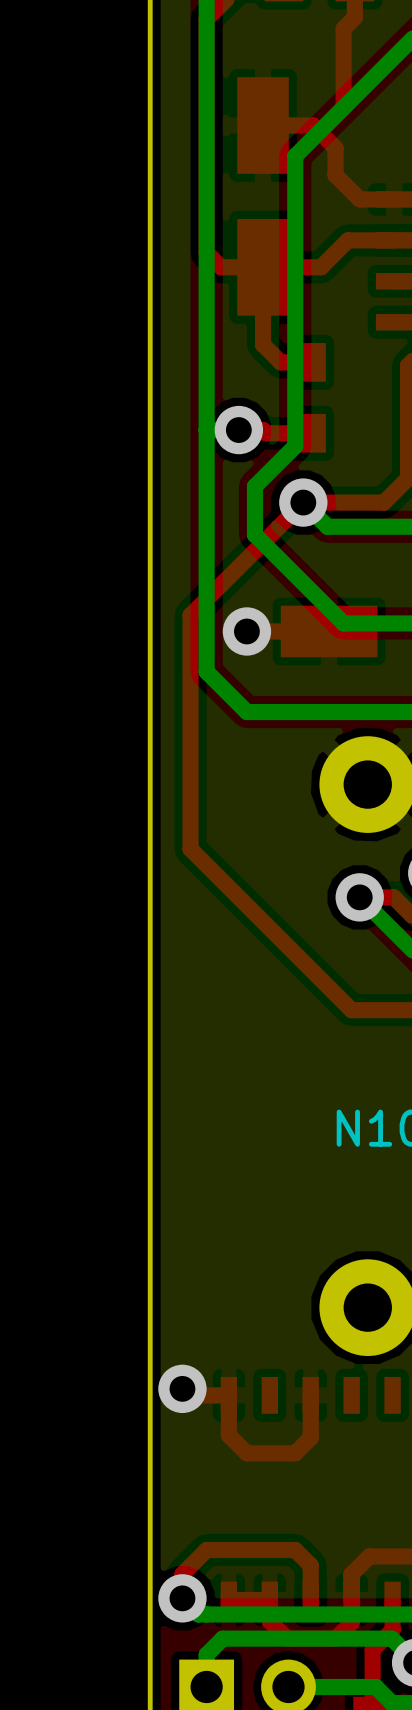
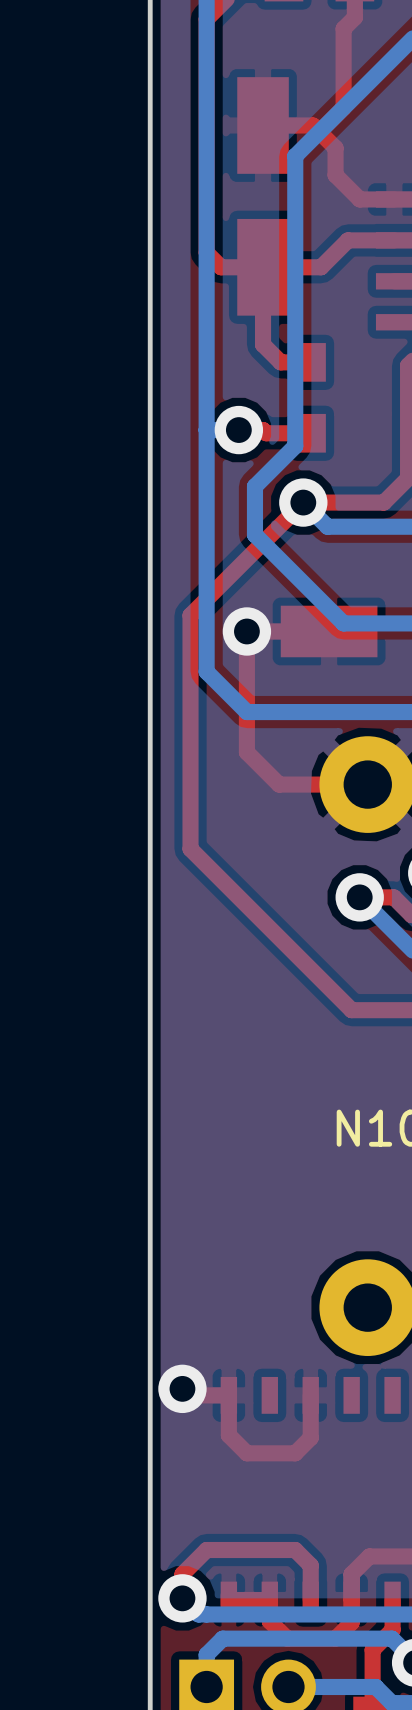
top track: none -> (246, 631) (246, 752) (279, 784) (367, 784)

